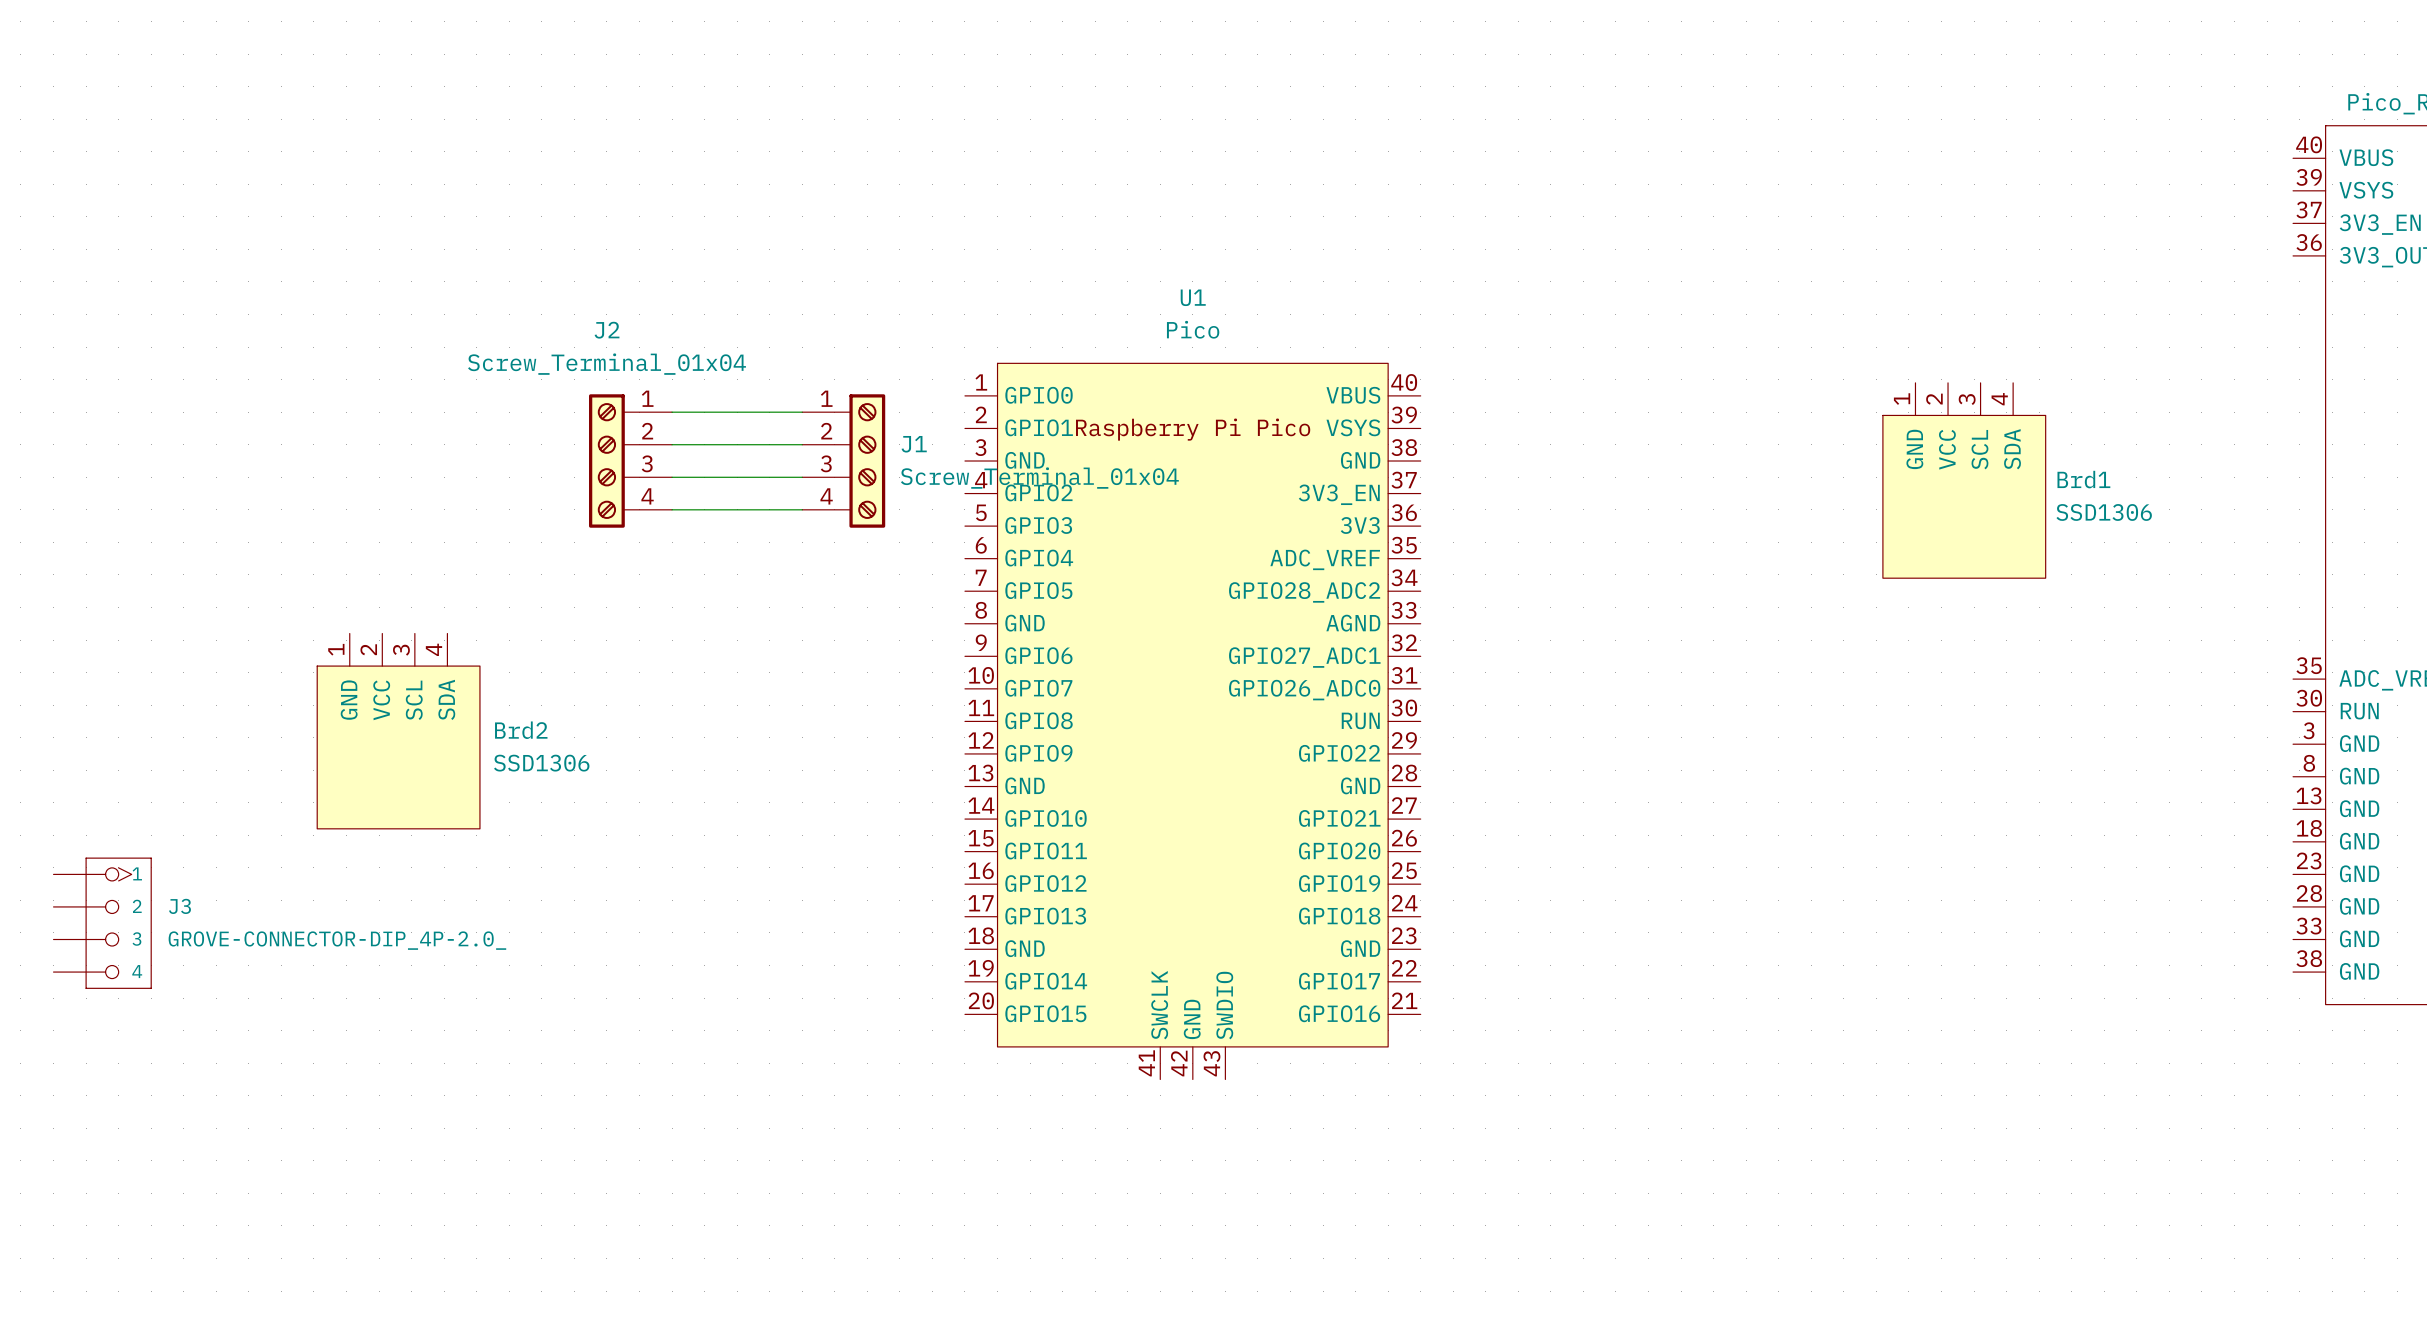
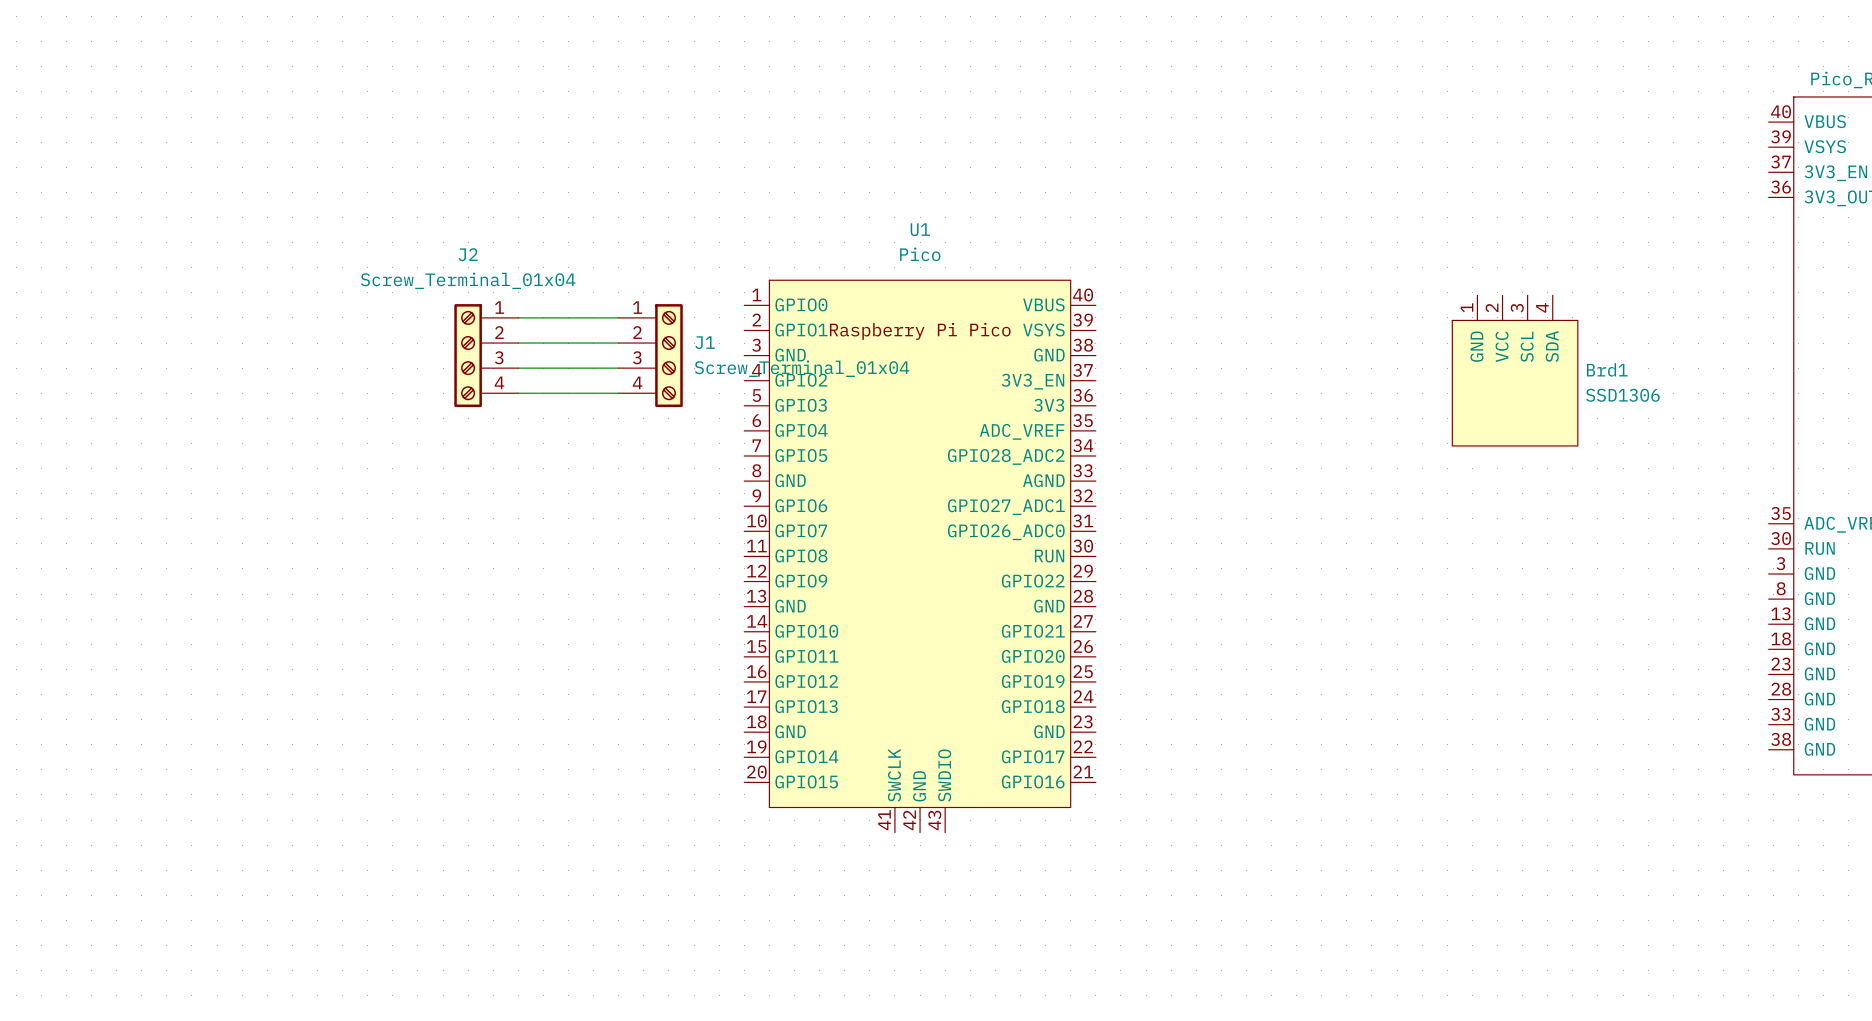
Brd2: SSD1306 (398, 731) -> none
J3: GROVE-CONNECTOR-DIP_4P-2.0_ (102, 923) -> none

